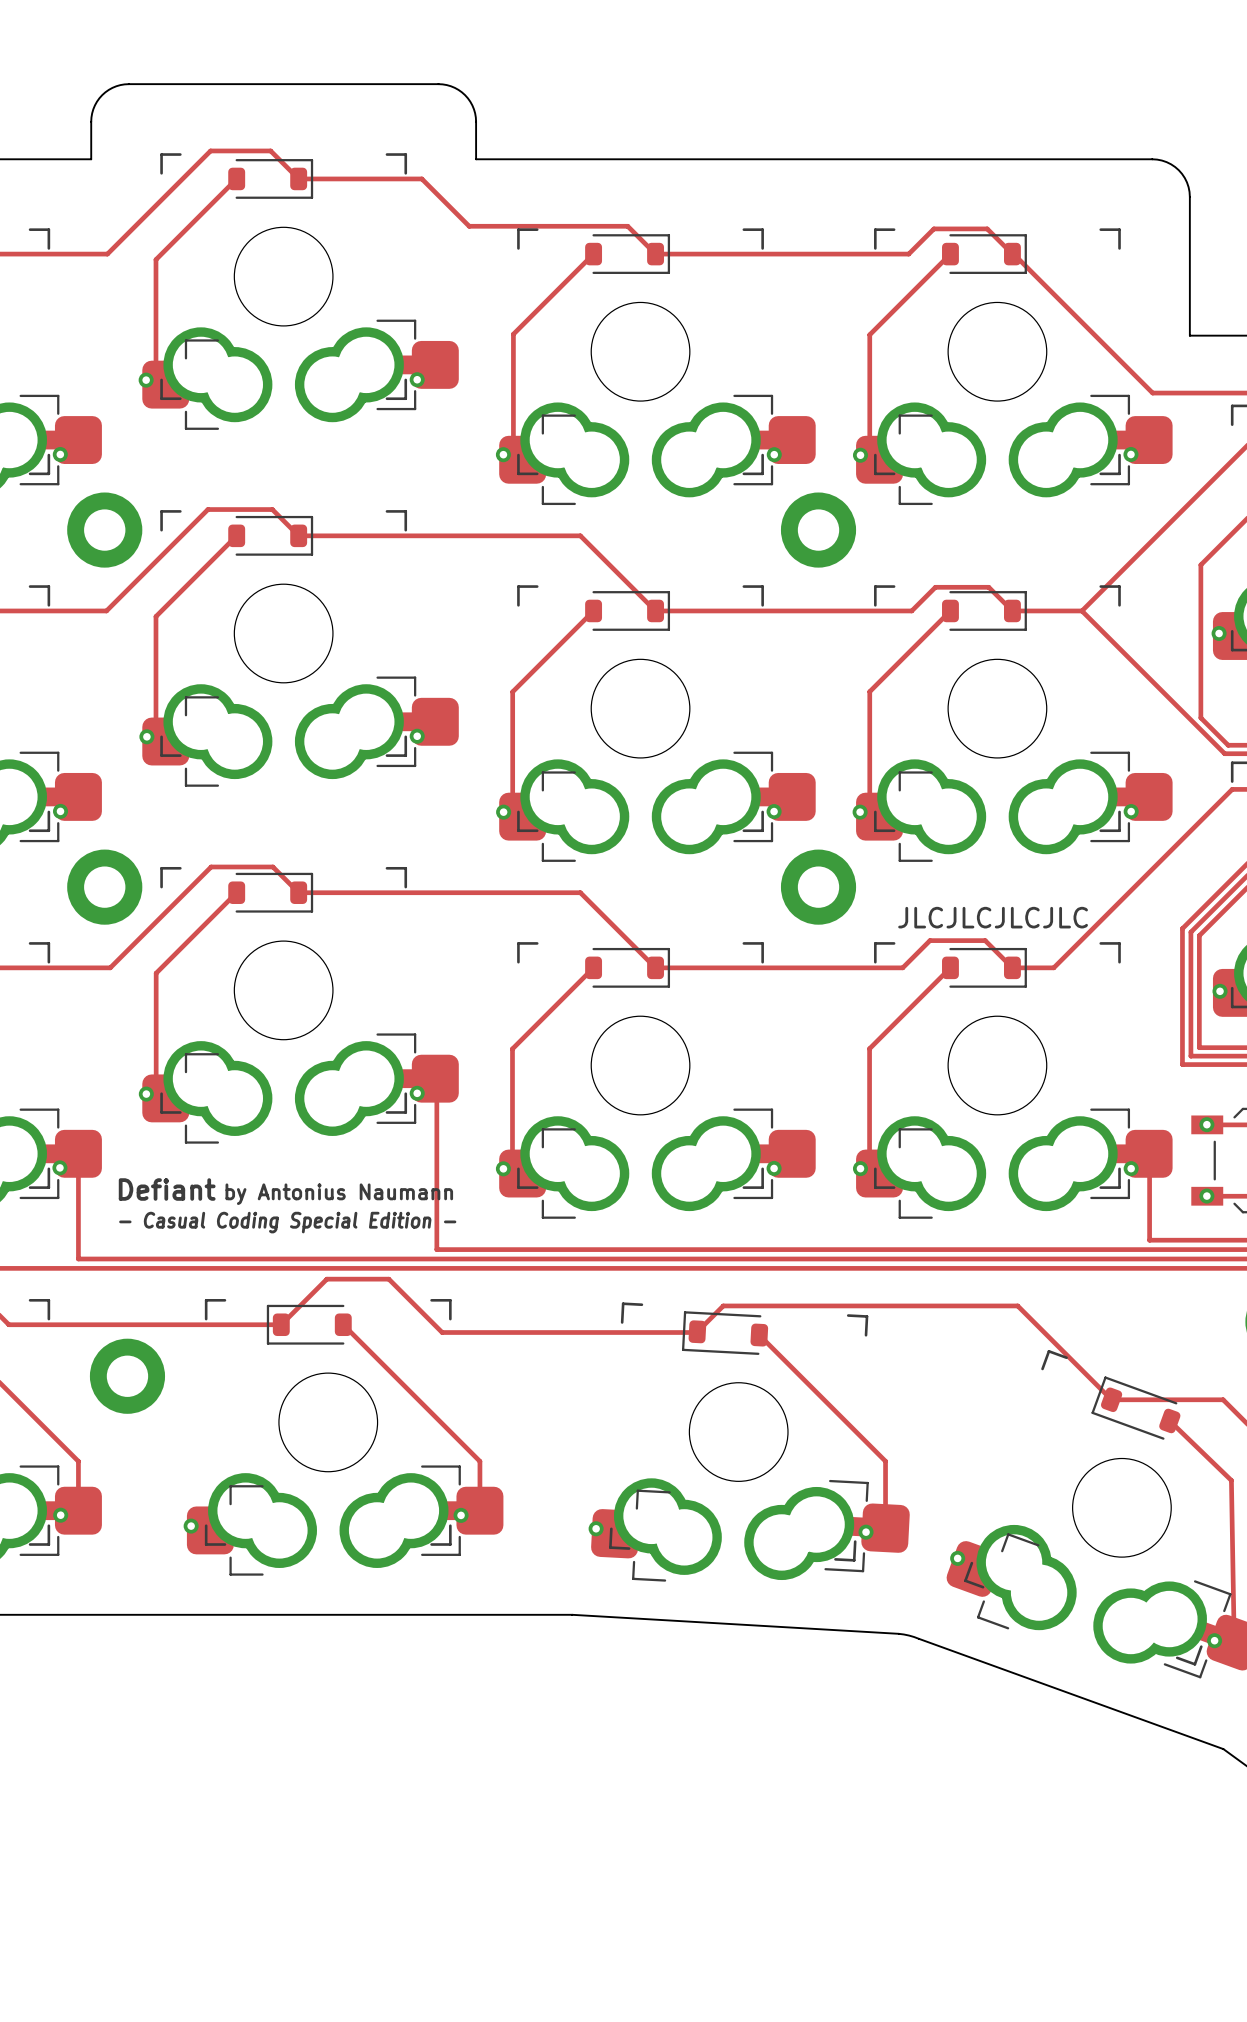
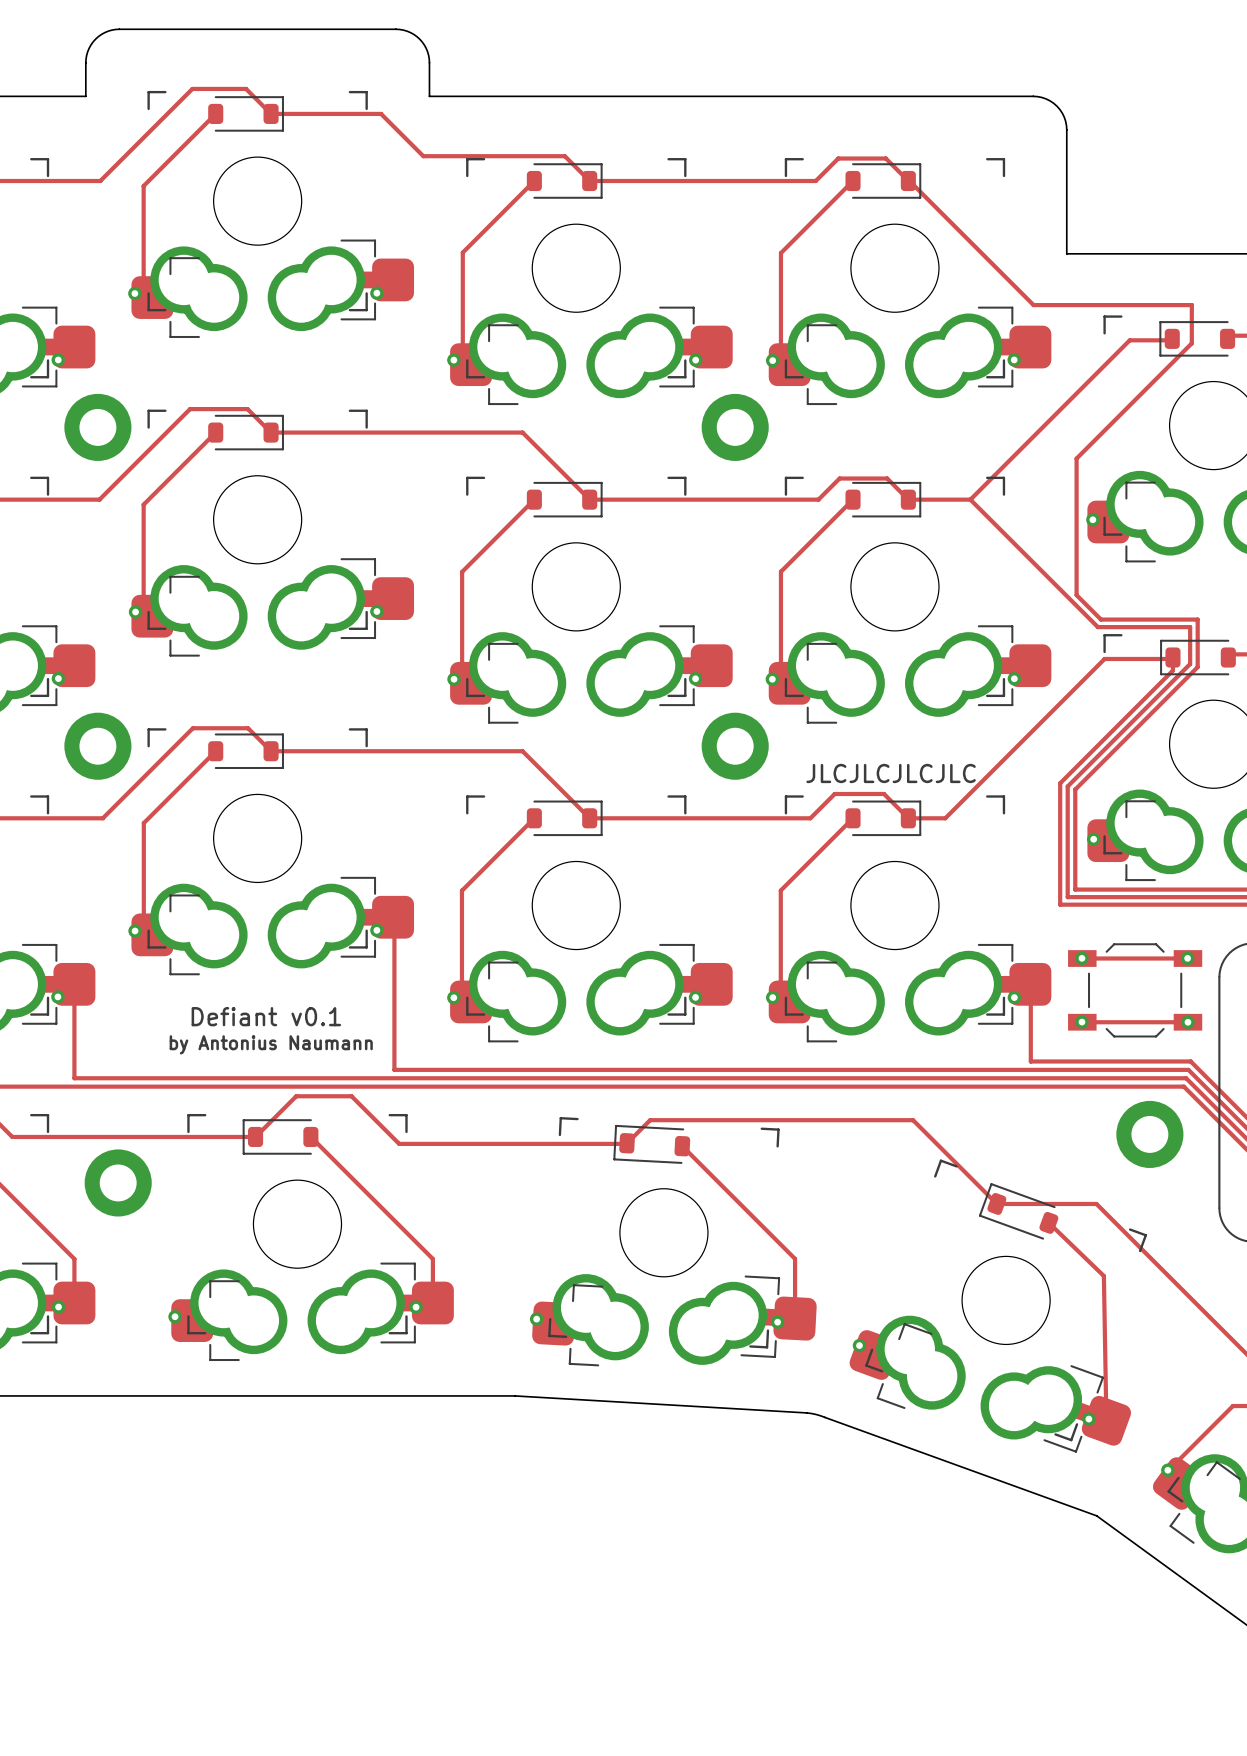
text: Defiant (167, 1189) -> none
text: by Antonius Naumann (339, 1194) -> Defiant v0.1 (266, 1016)
text: none -> by Antonius Naumann (271, 1044)
text: - Casual Coding Special Edition - (287, 1222) -> none

